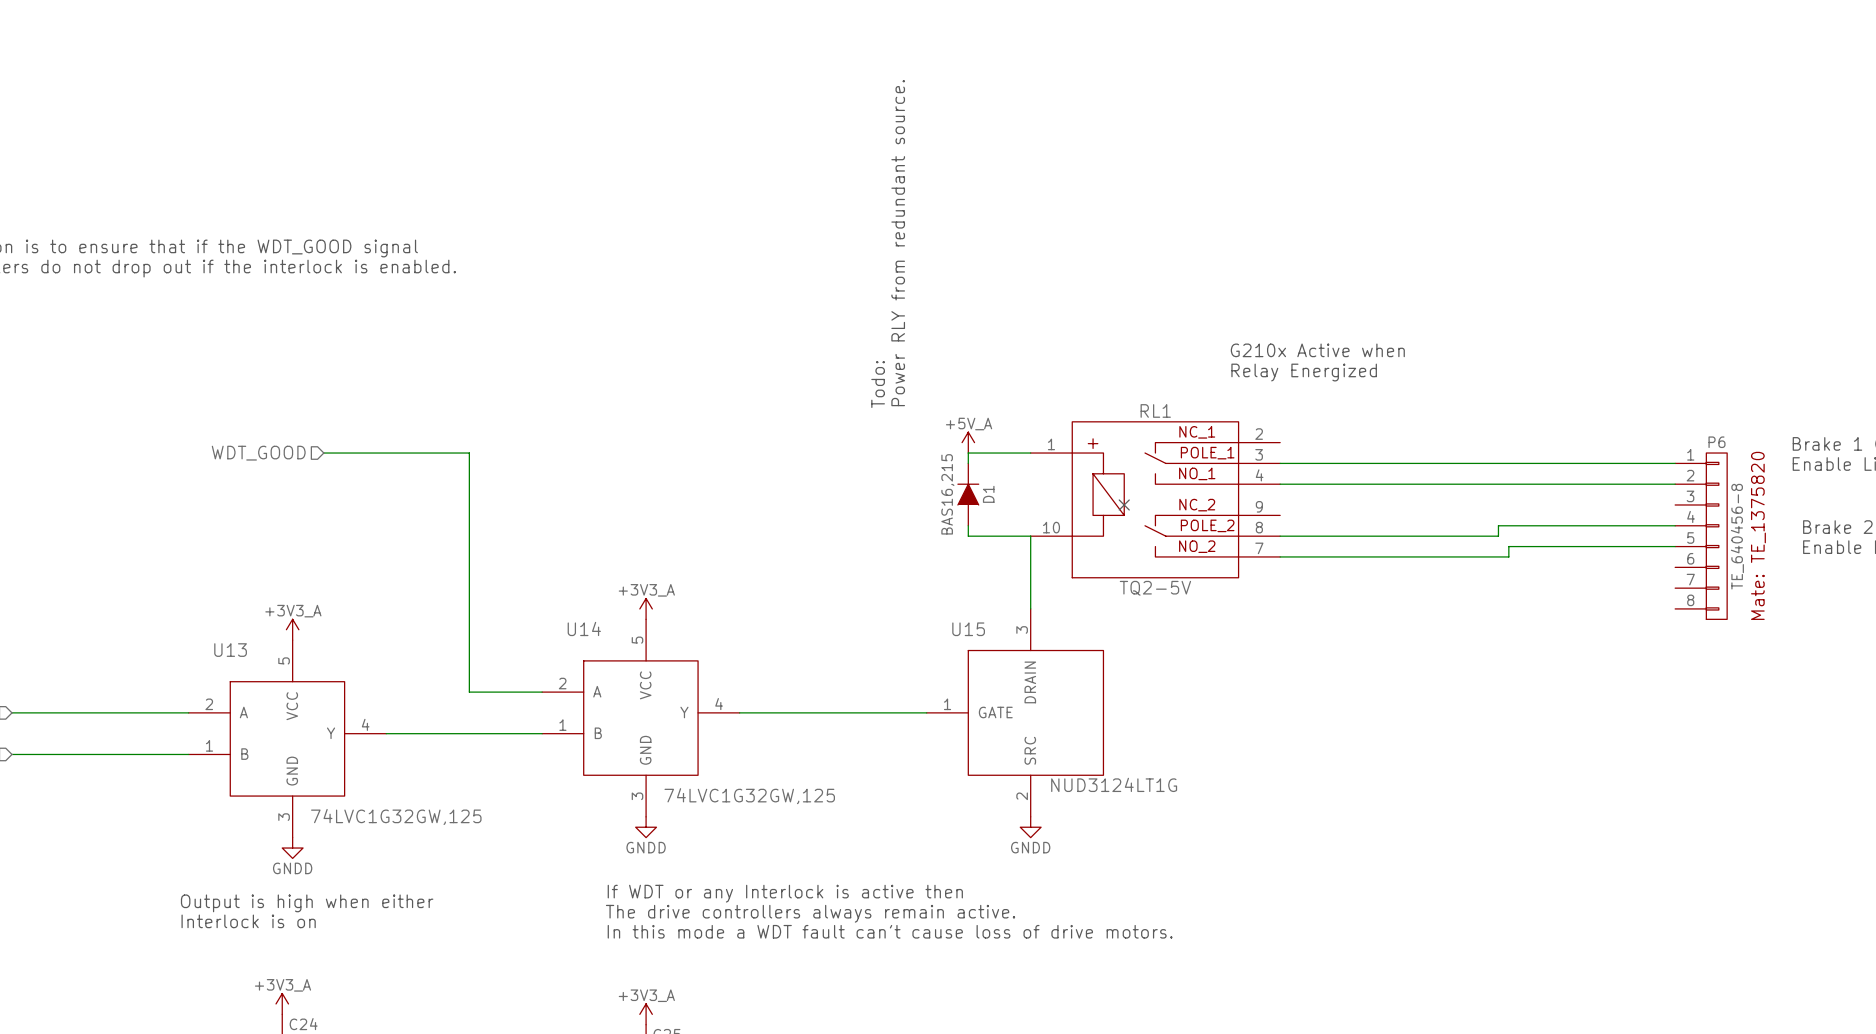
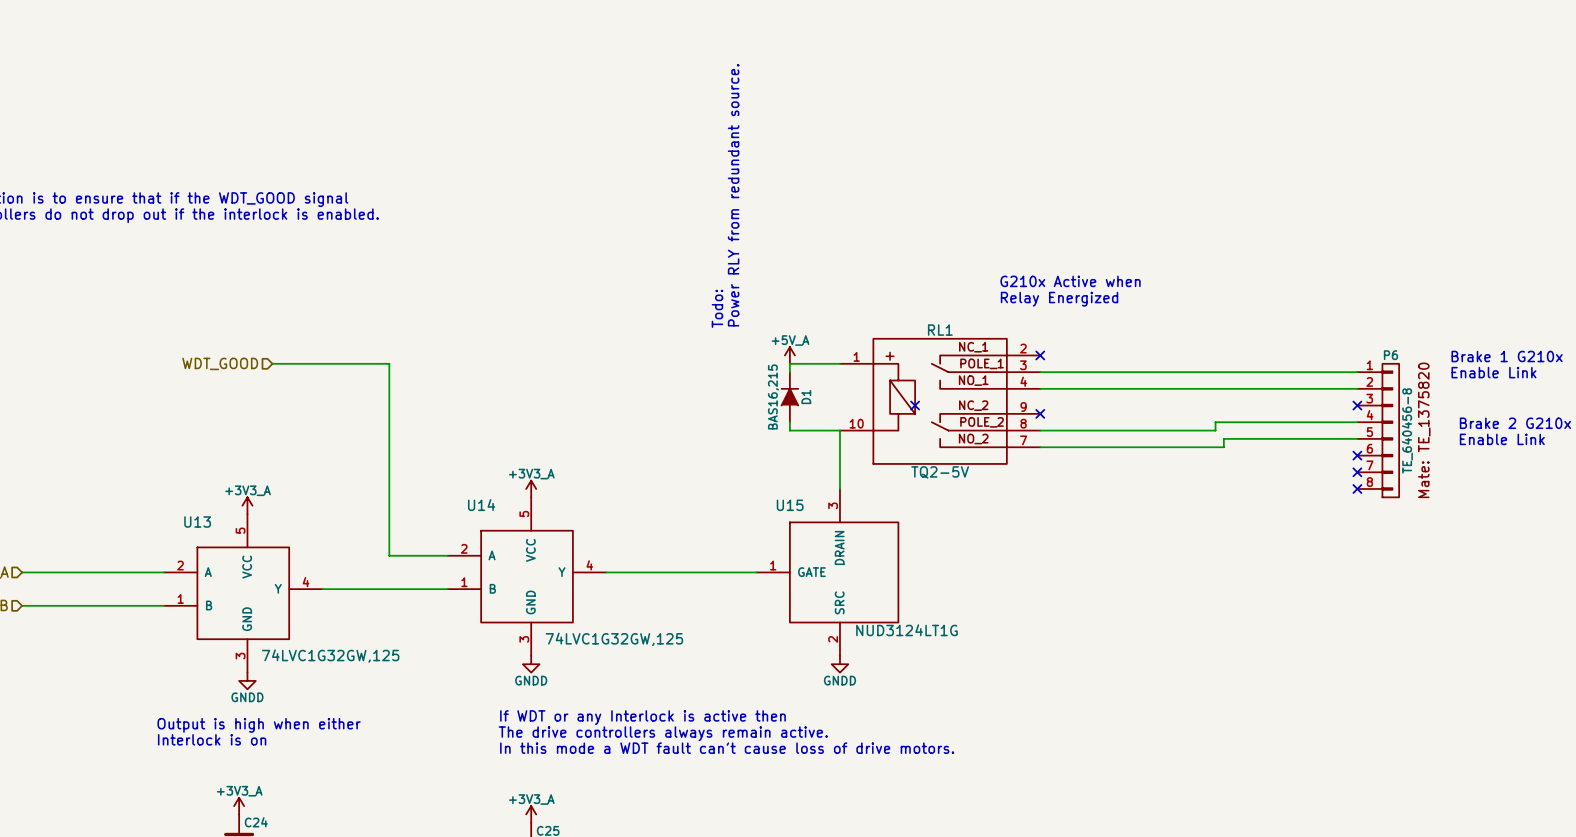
no-connect mark: none -> (1040, 355)
no-connect mark: none -> (1357, 405)
no-connect mark: none -> (1040, 413)
no-connect mark: none -> (1357, 455)
no-connect mark: none -> (1357, 472)
no-connect mark: none -> (1357, 488)

